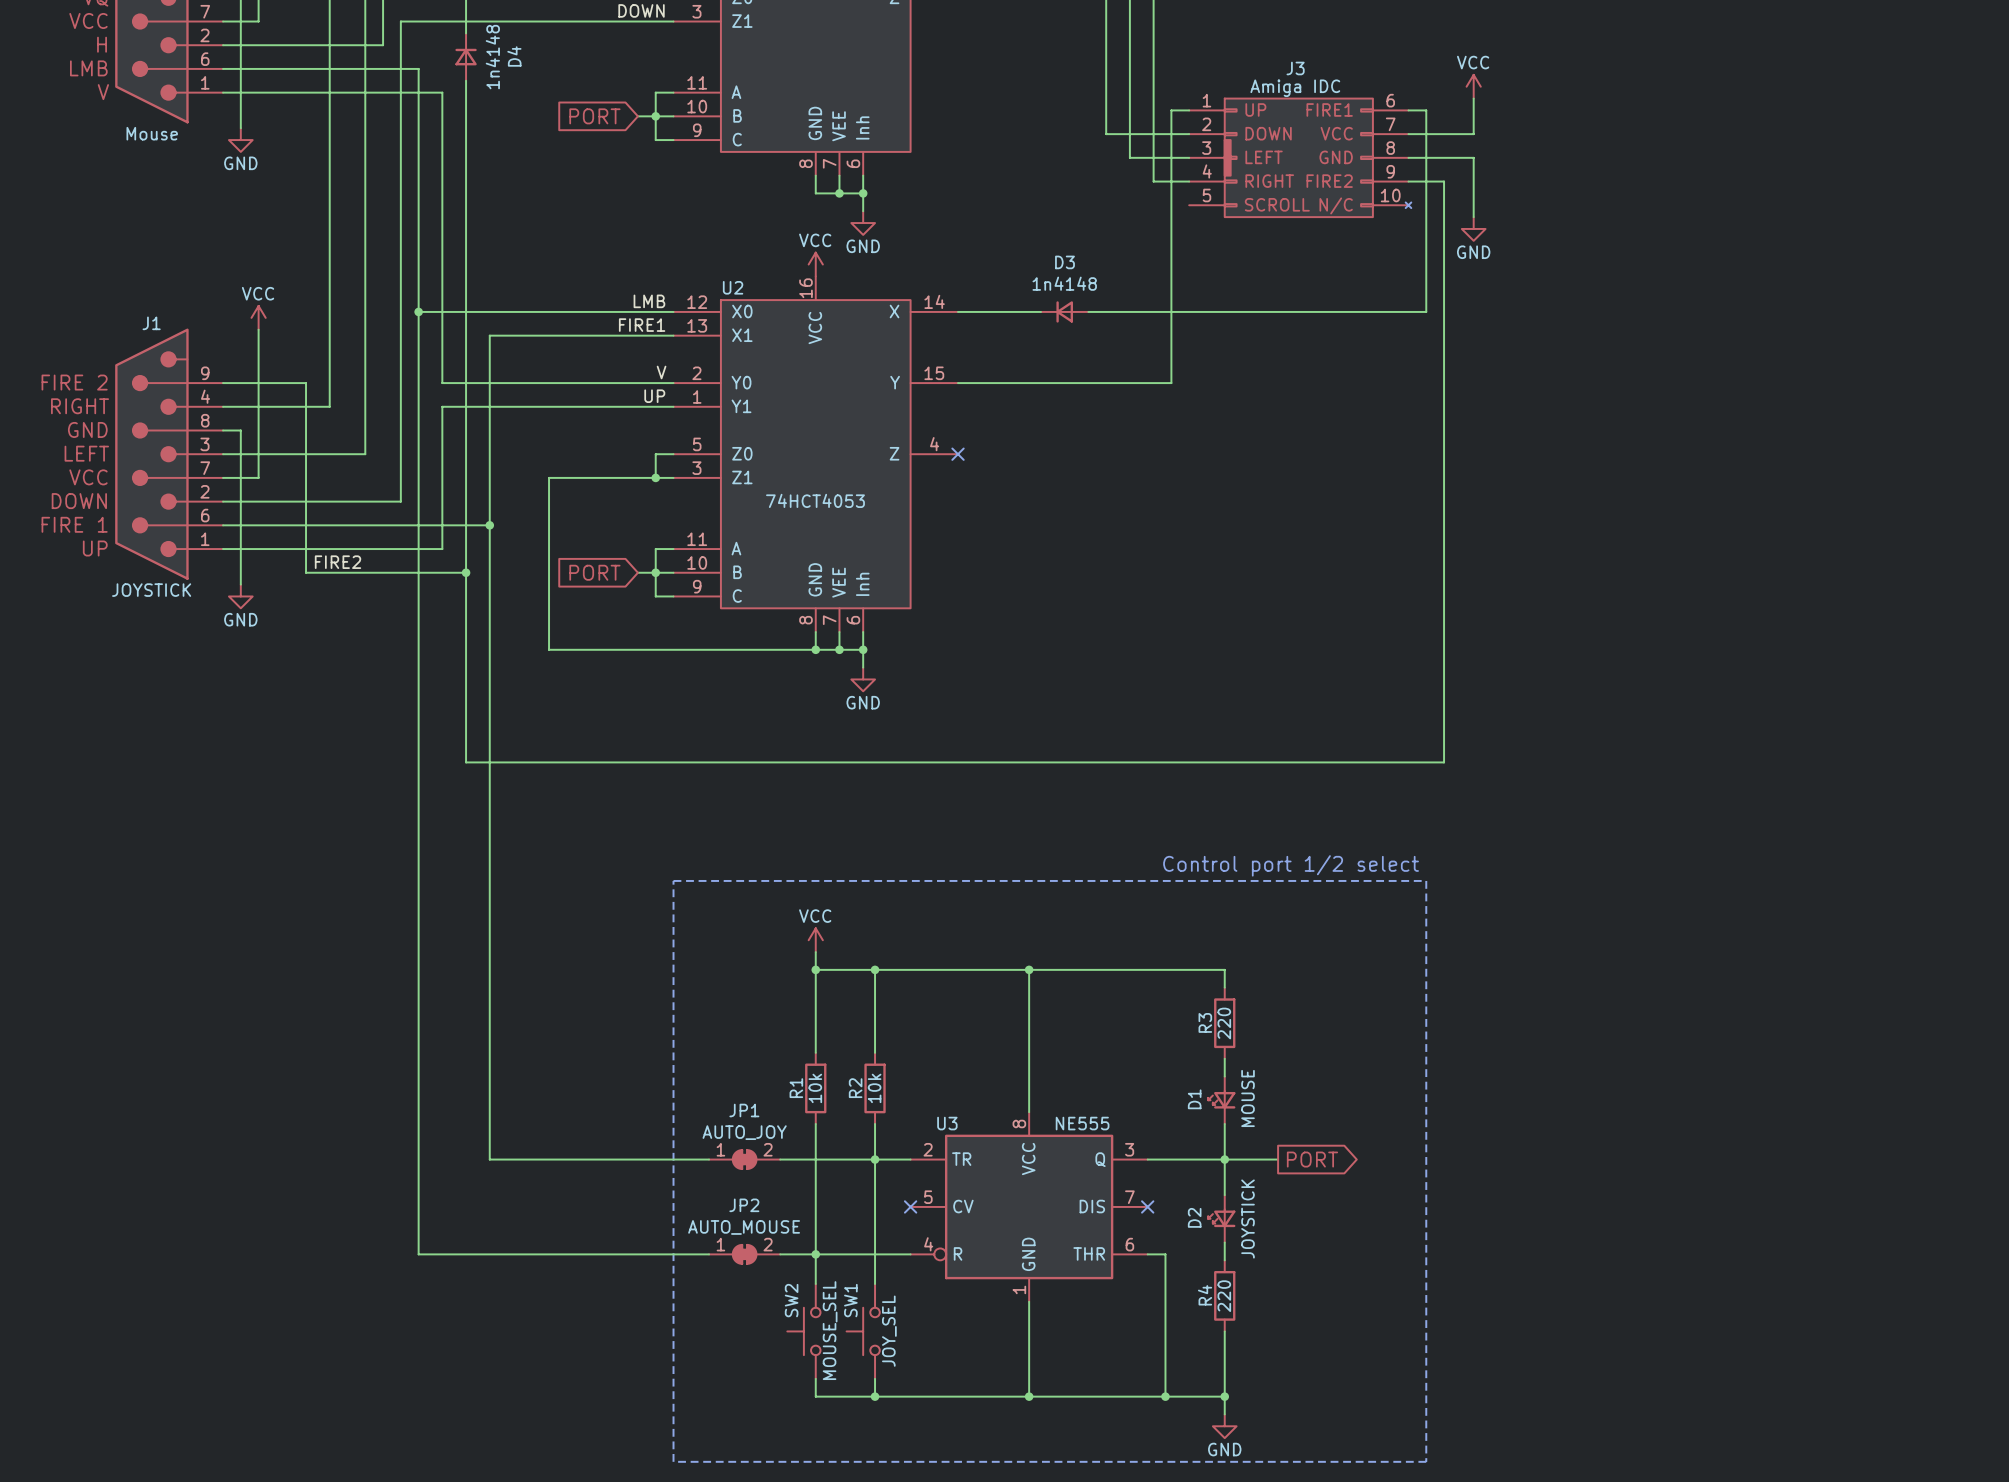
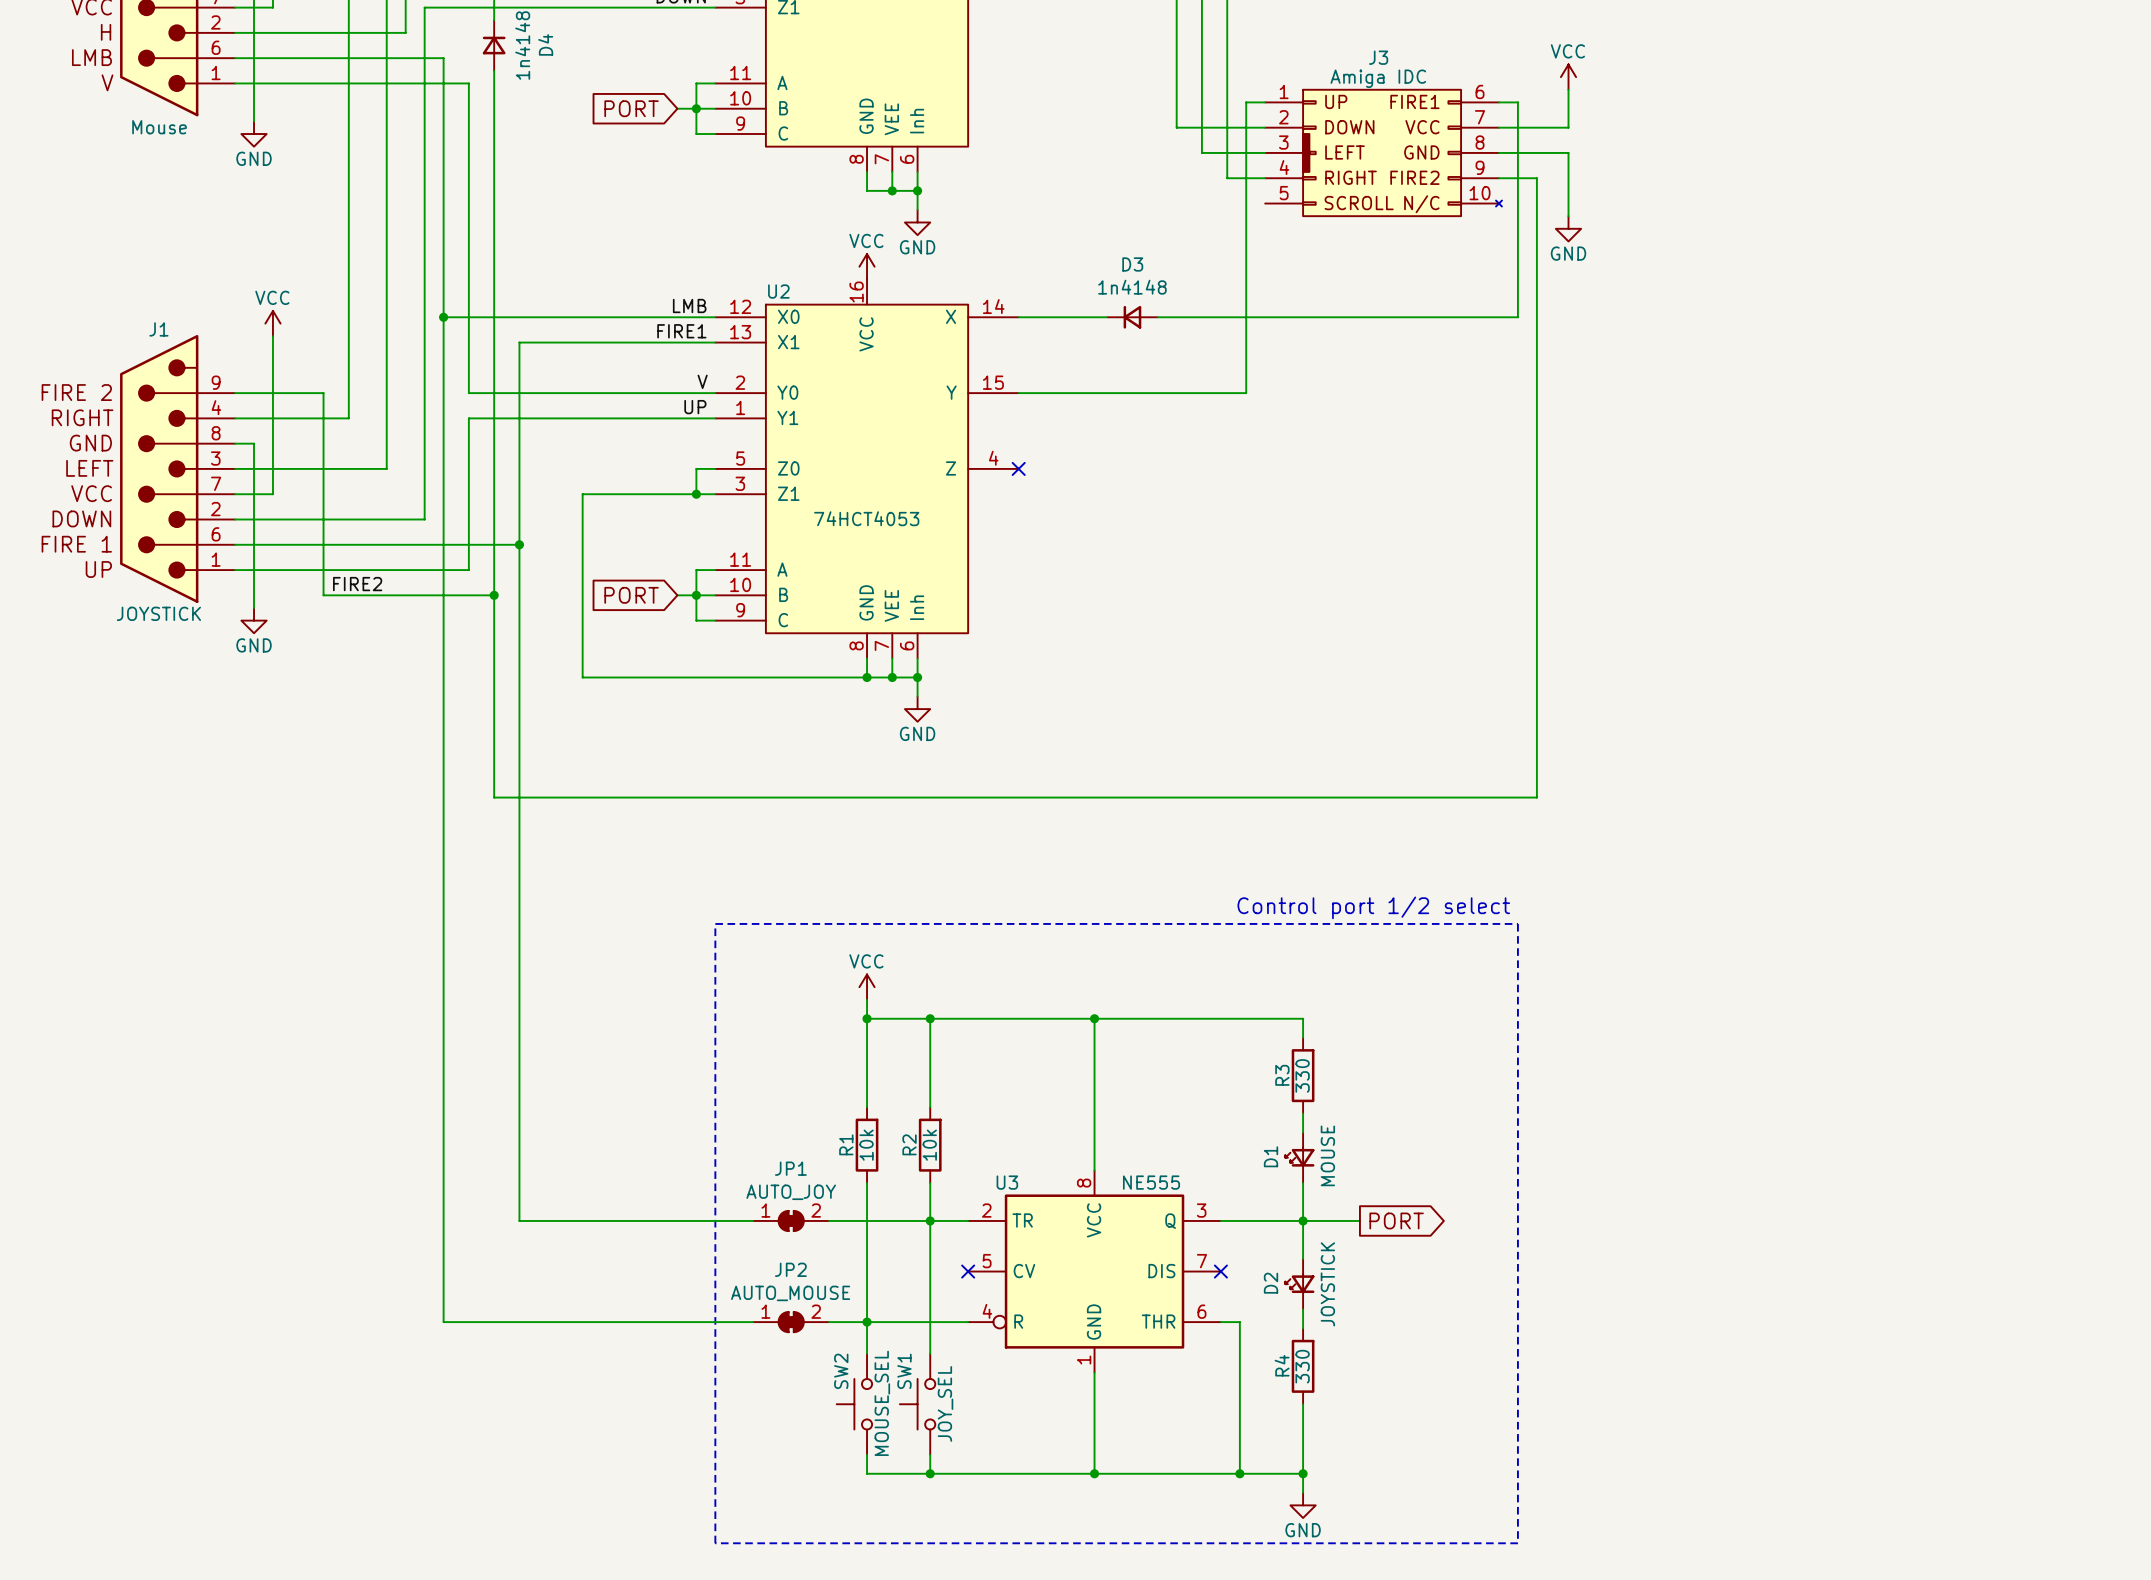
R3 value: 220 (1224, 1023) -> 330 (1302, 1075)
R4 value: 220 (1224, 1296) -> 330 (1302, 1366)

